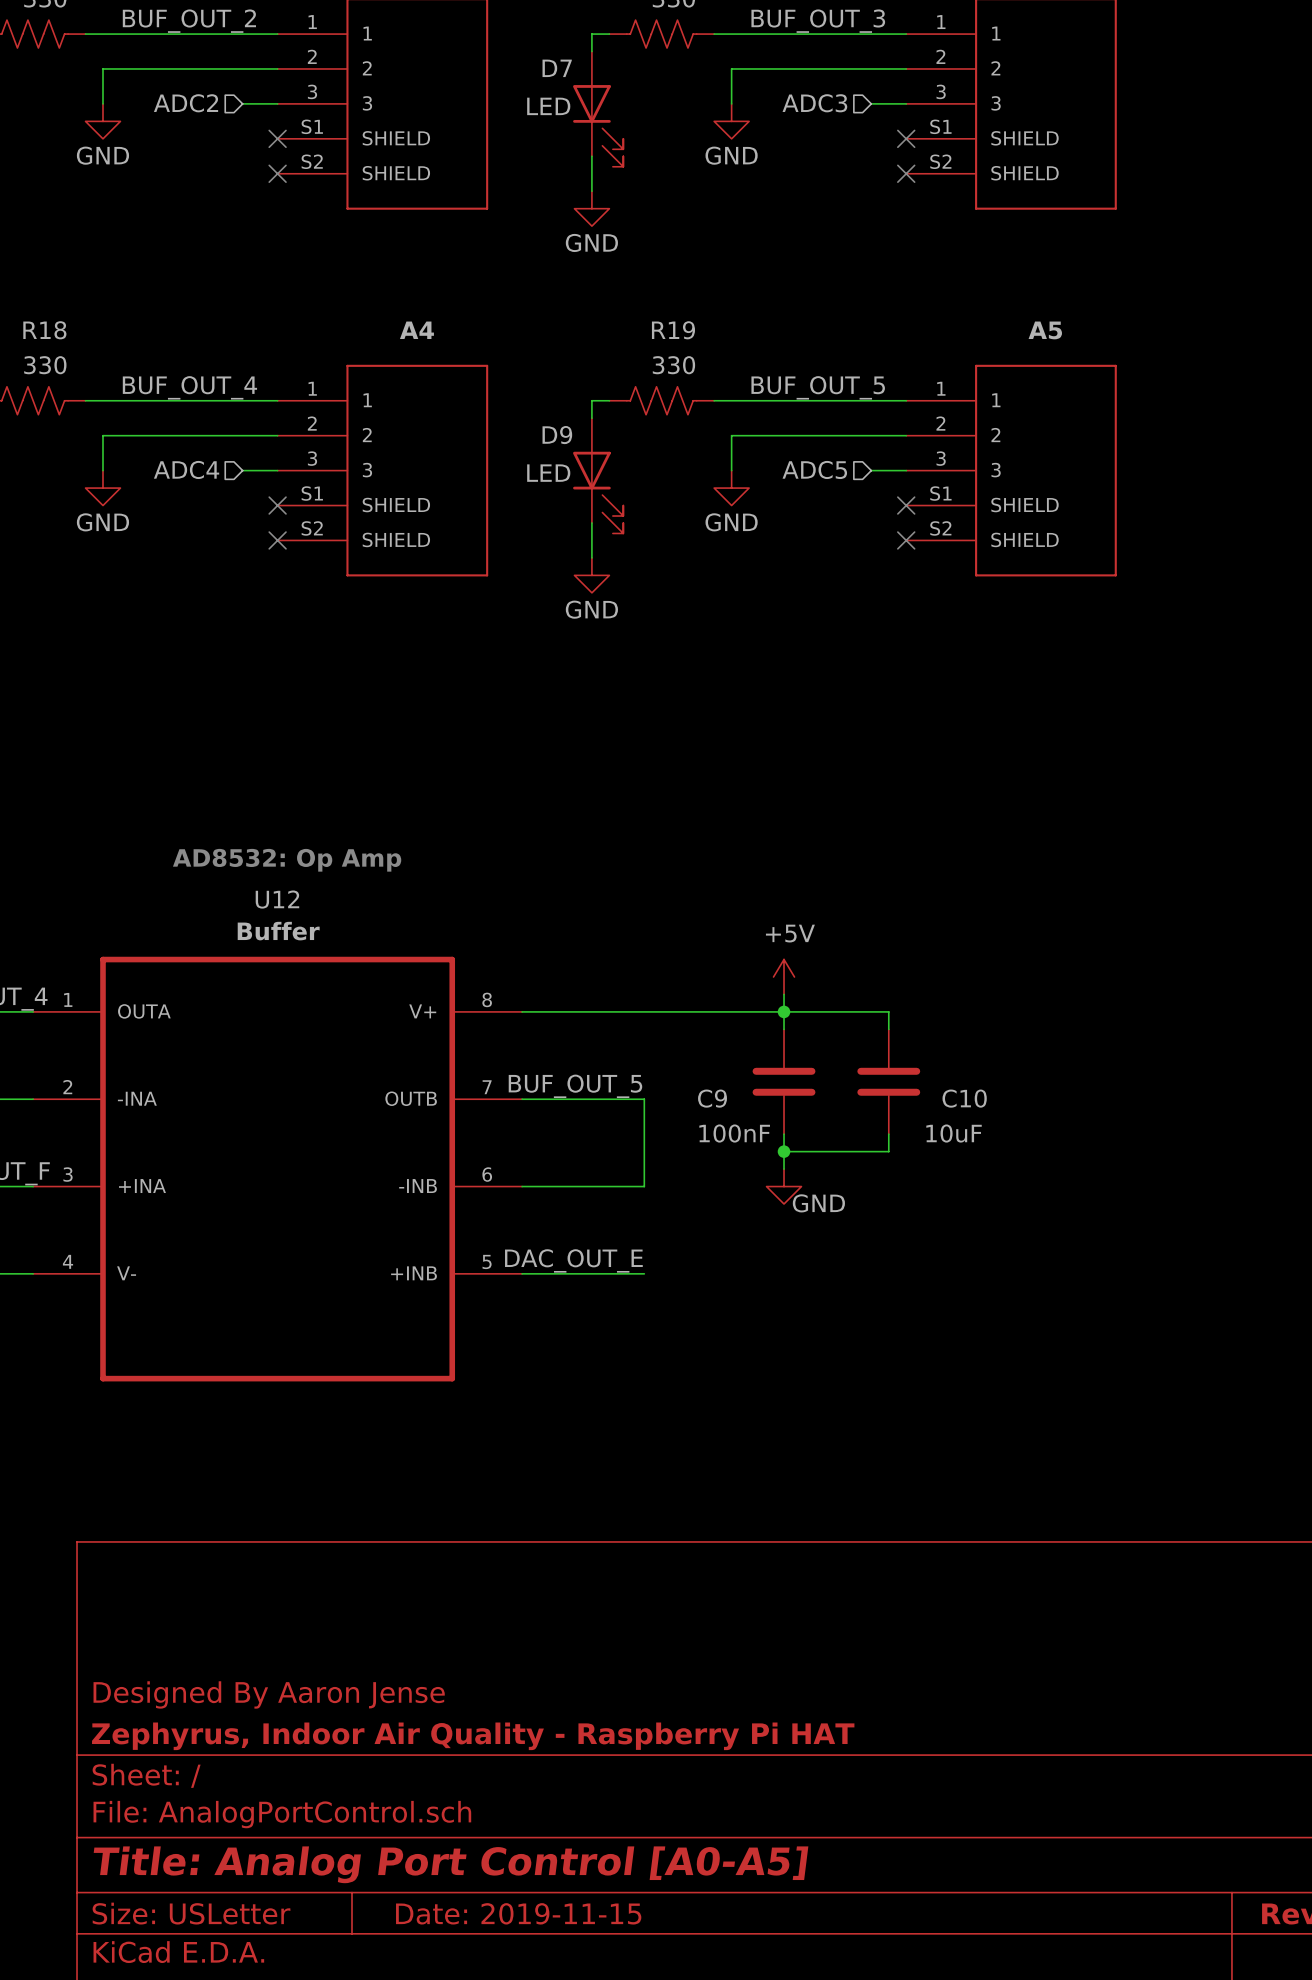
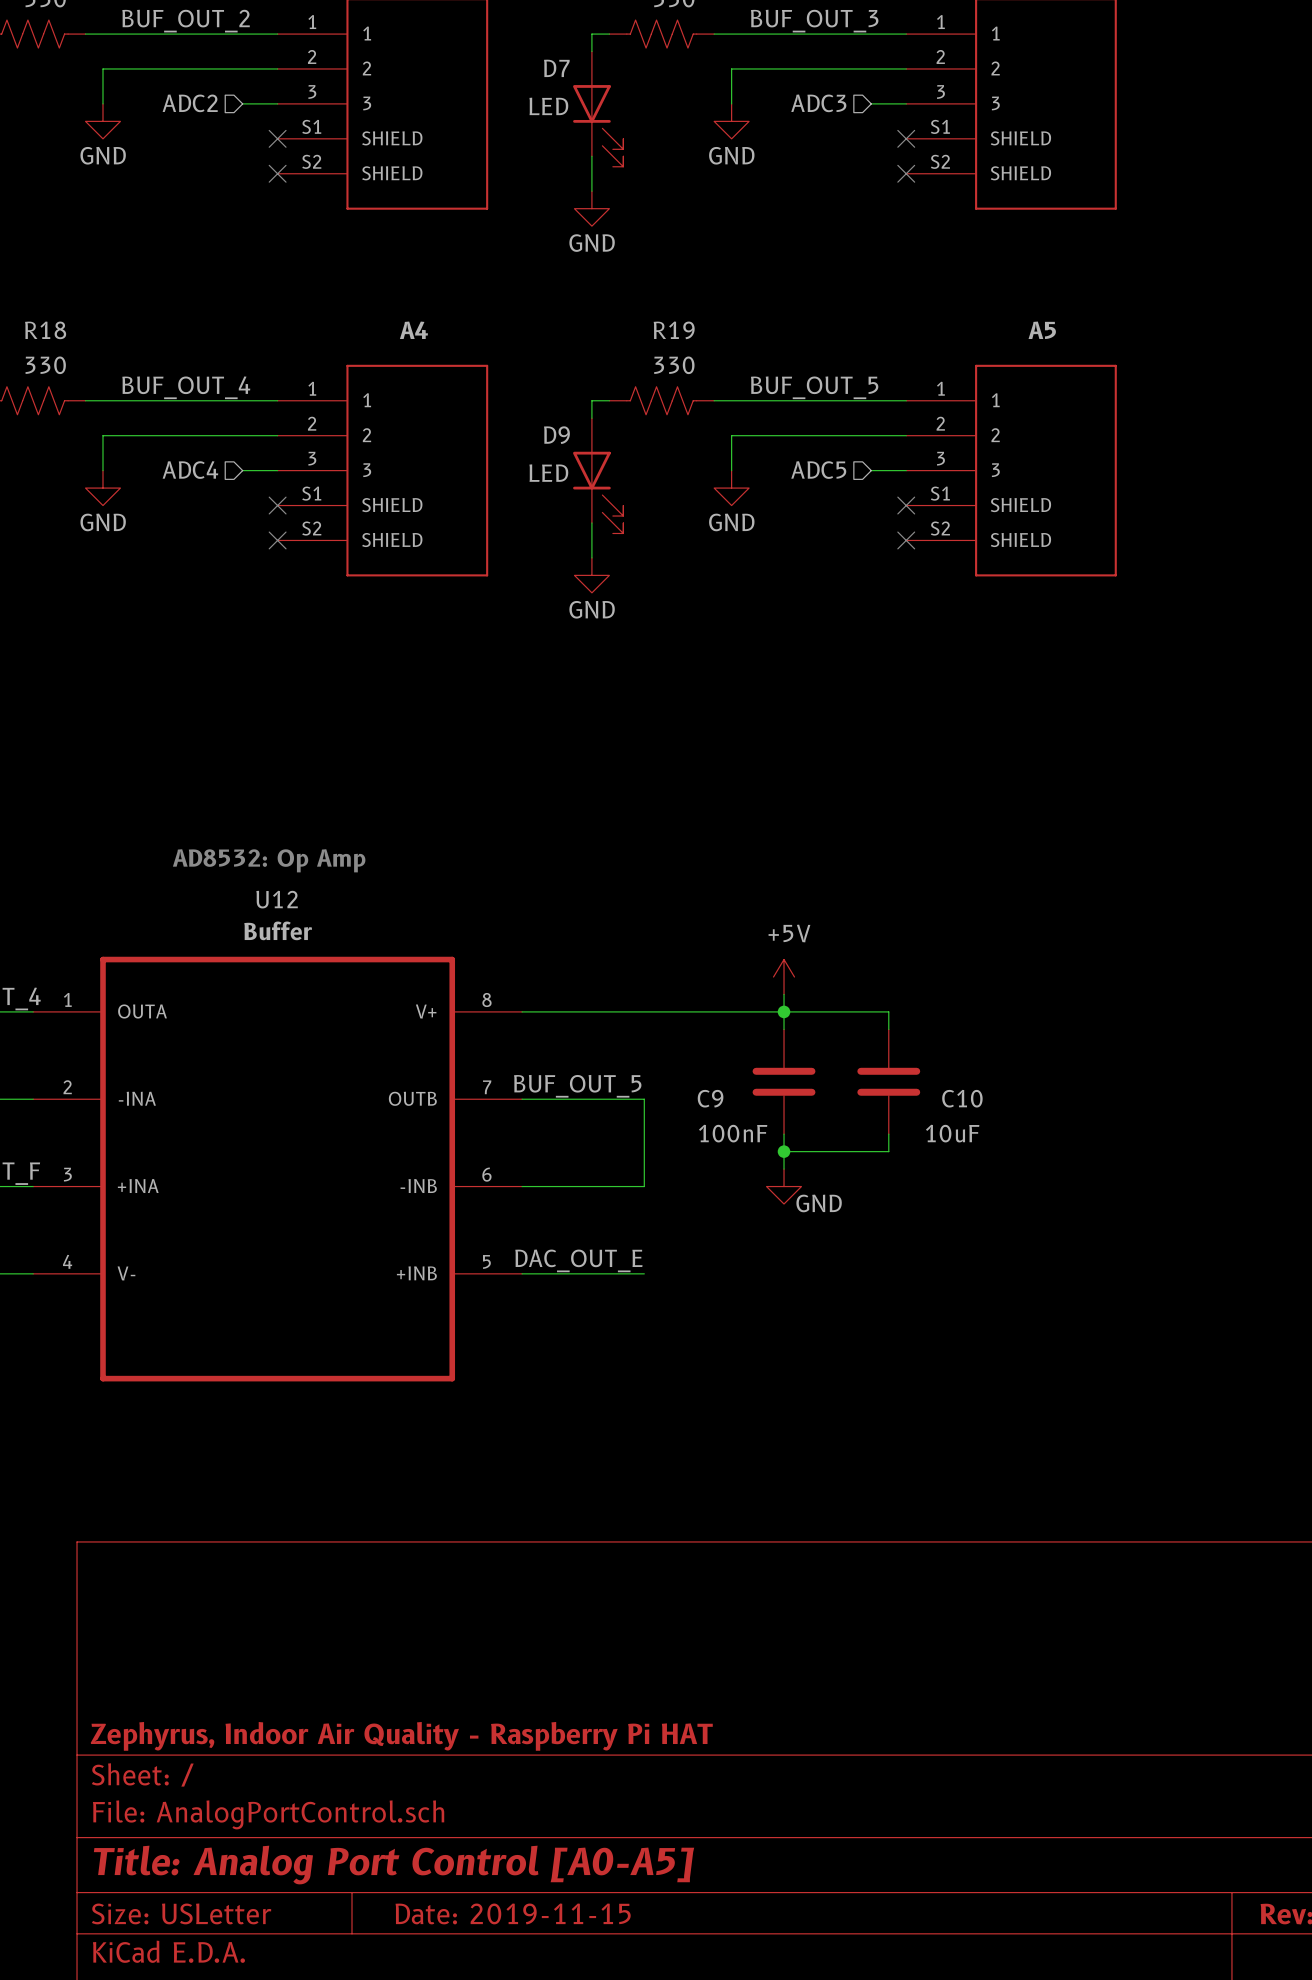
title block: Designed By Aaron Jense (269, 1694) -> none

